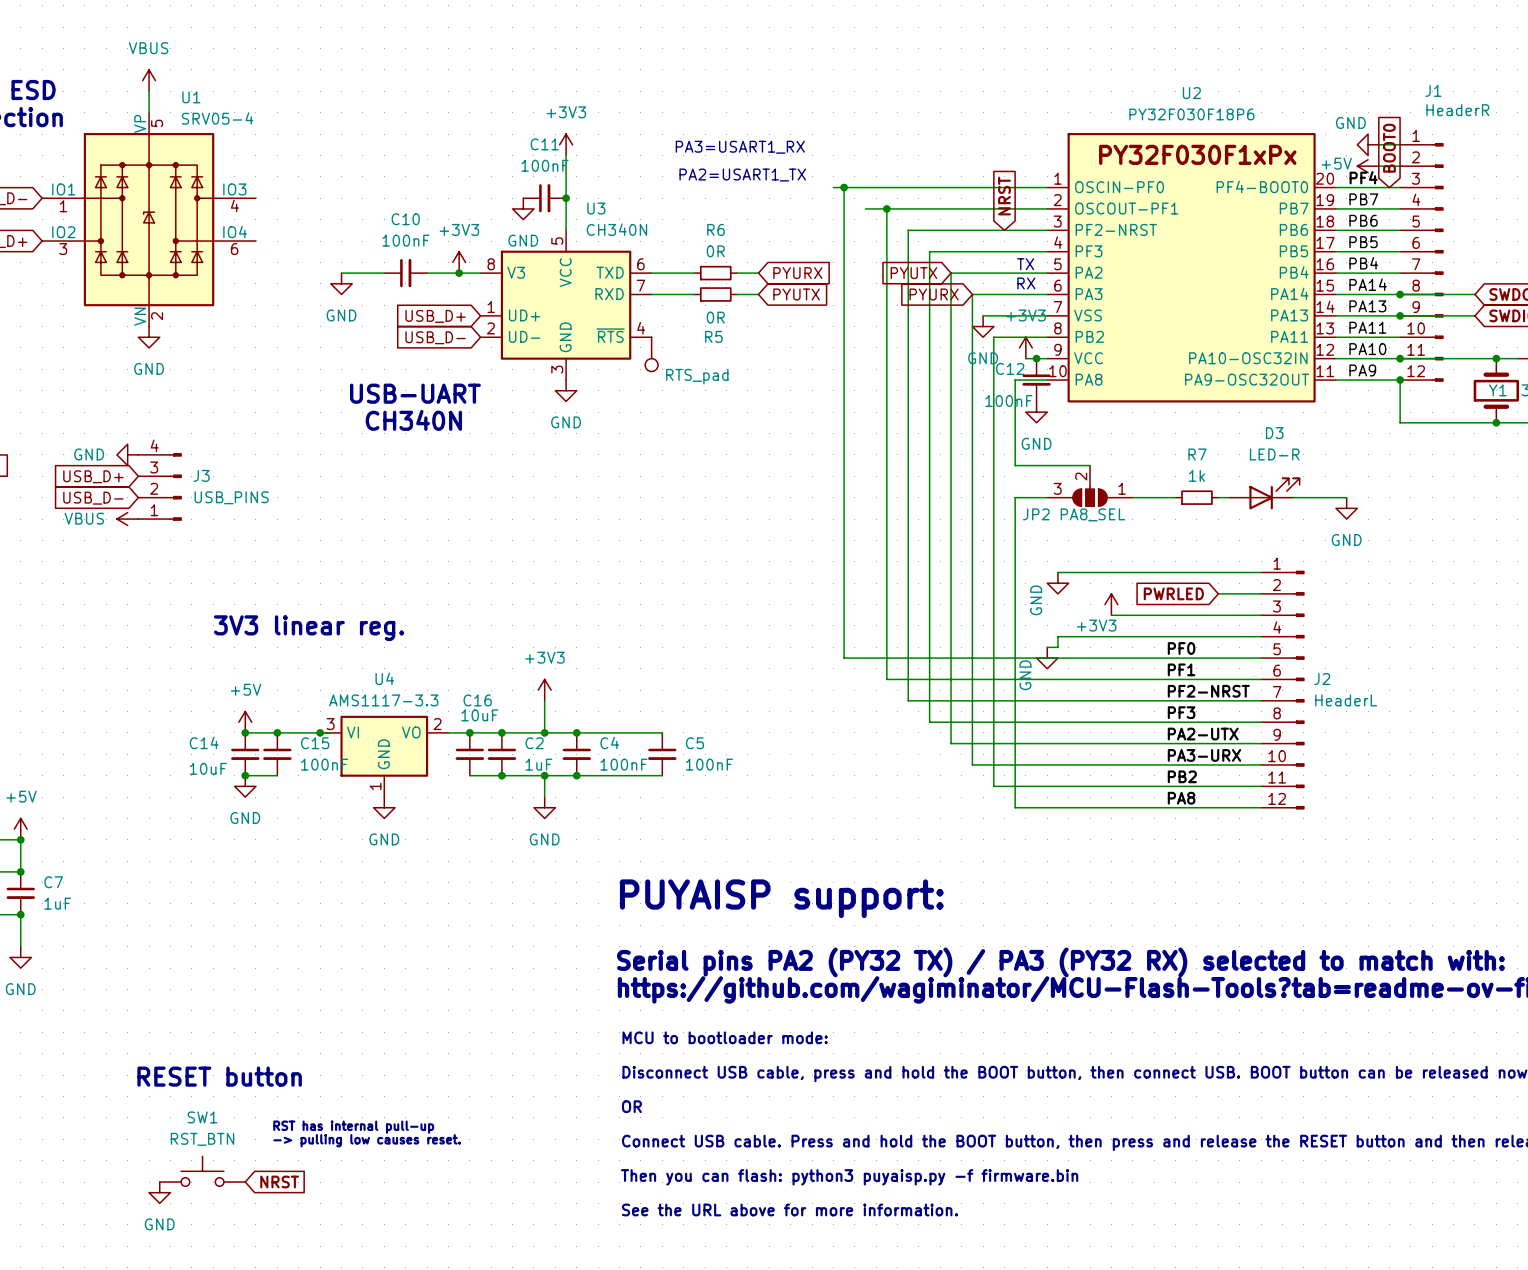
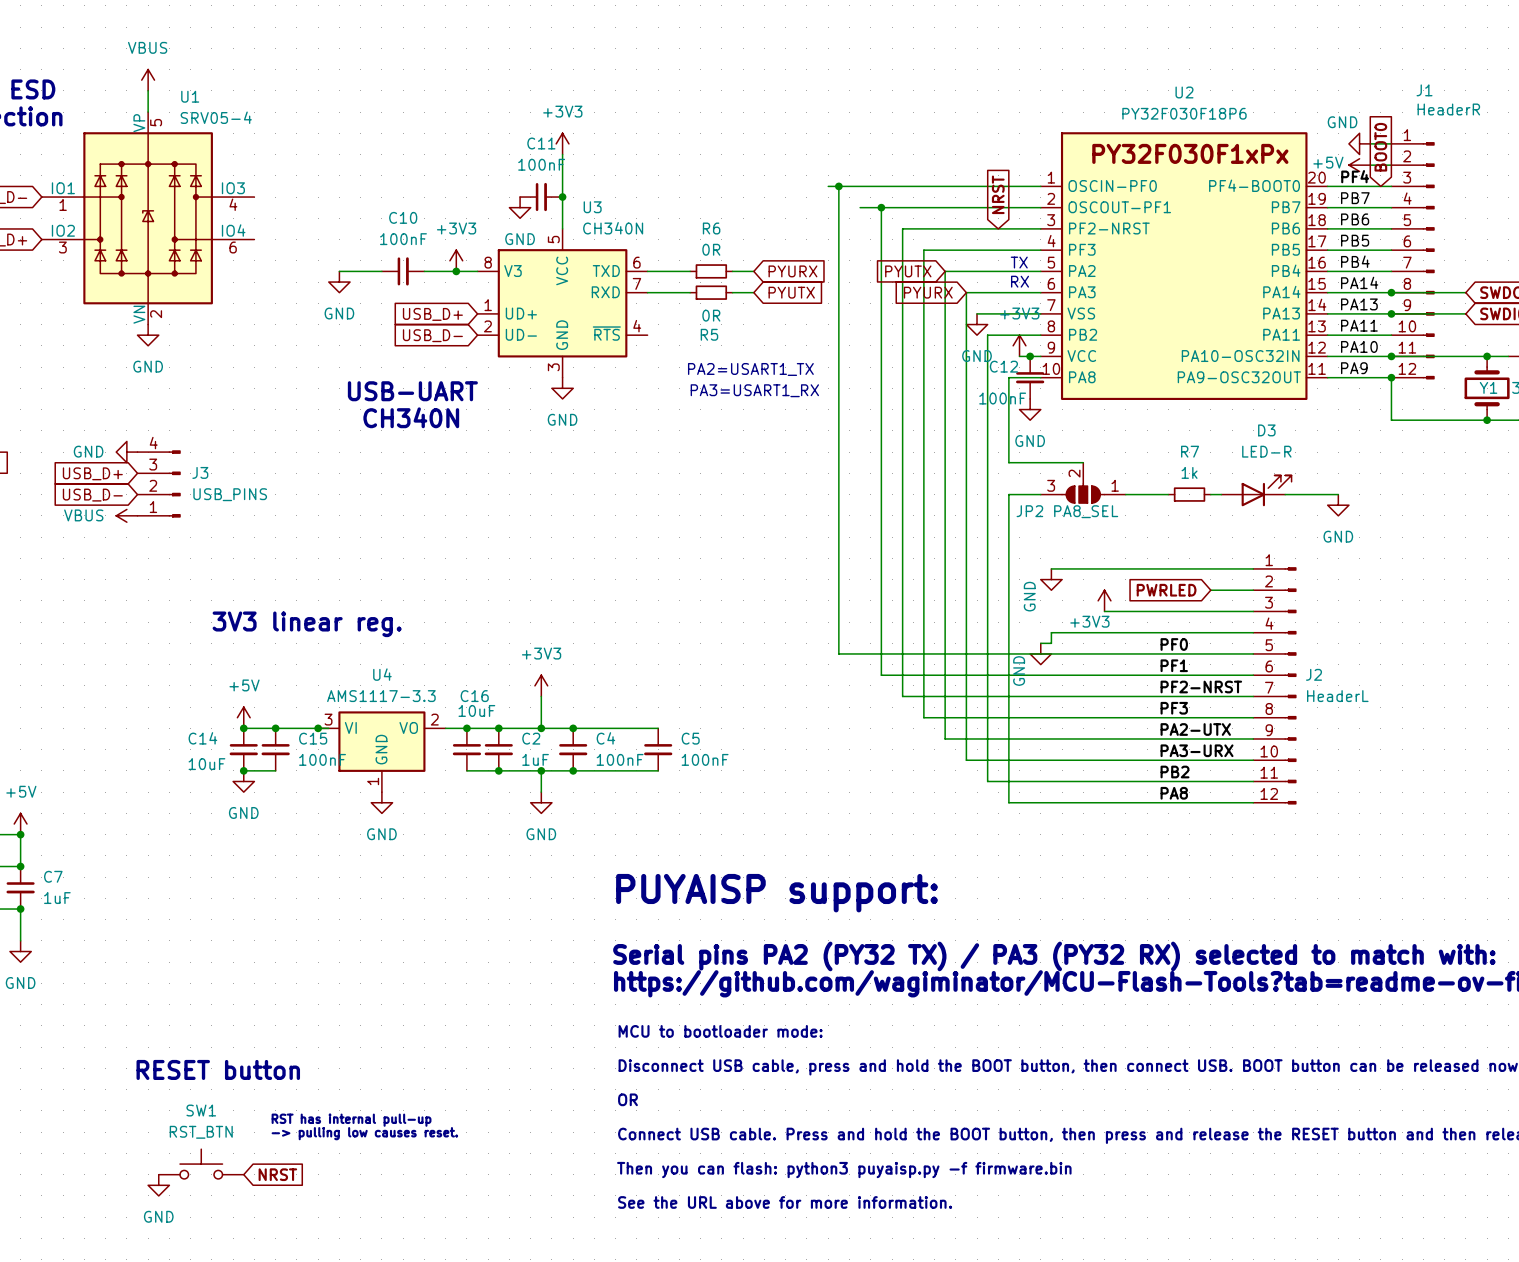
text: PA3=USART1_RX (740, 147) -> none
text position: PA2=USART1_TX (742, 175) -> PA2=USART1_TX (750, 369)
part: RTS_pad (651, 354) -> none
text: none -> PA3=USART1_RX (754, 390)

